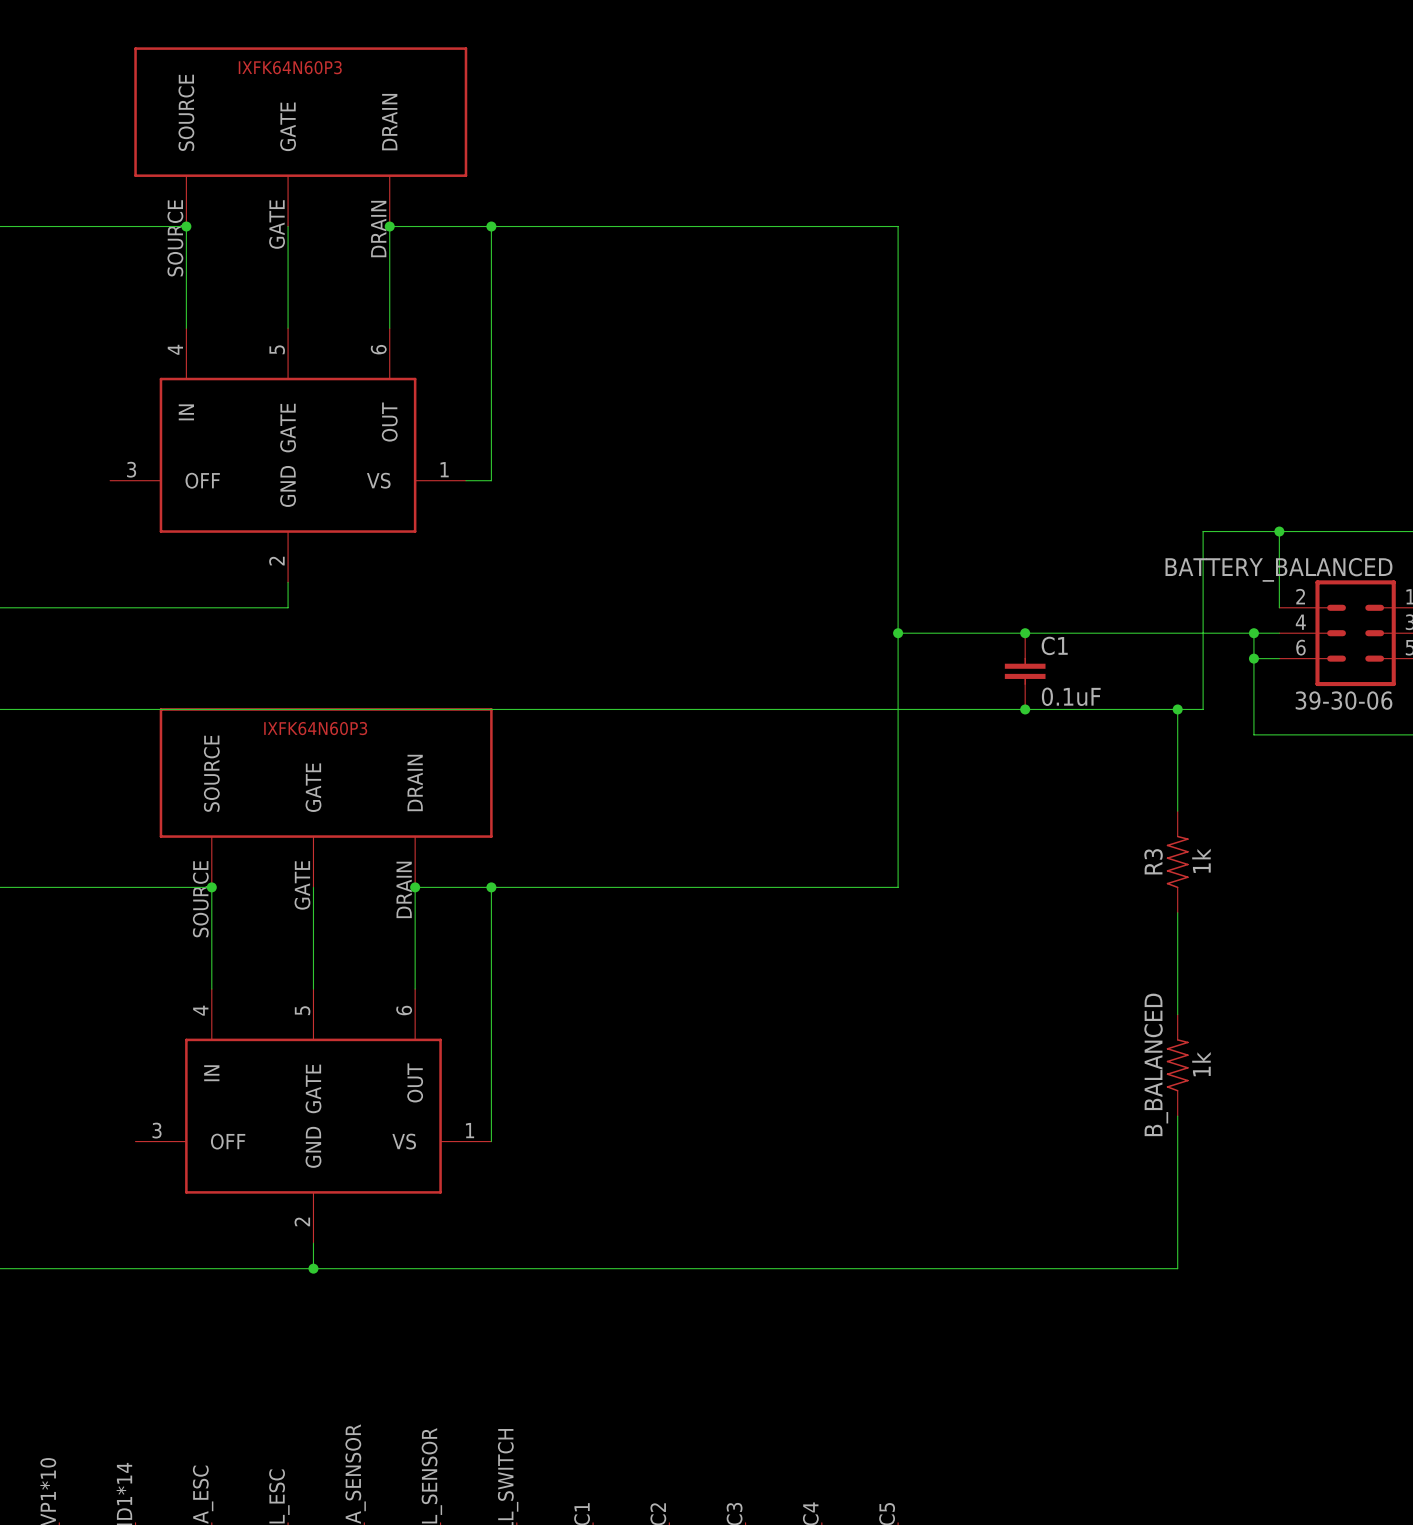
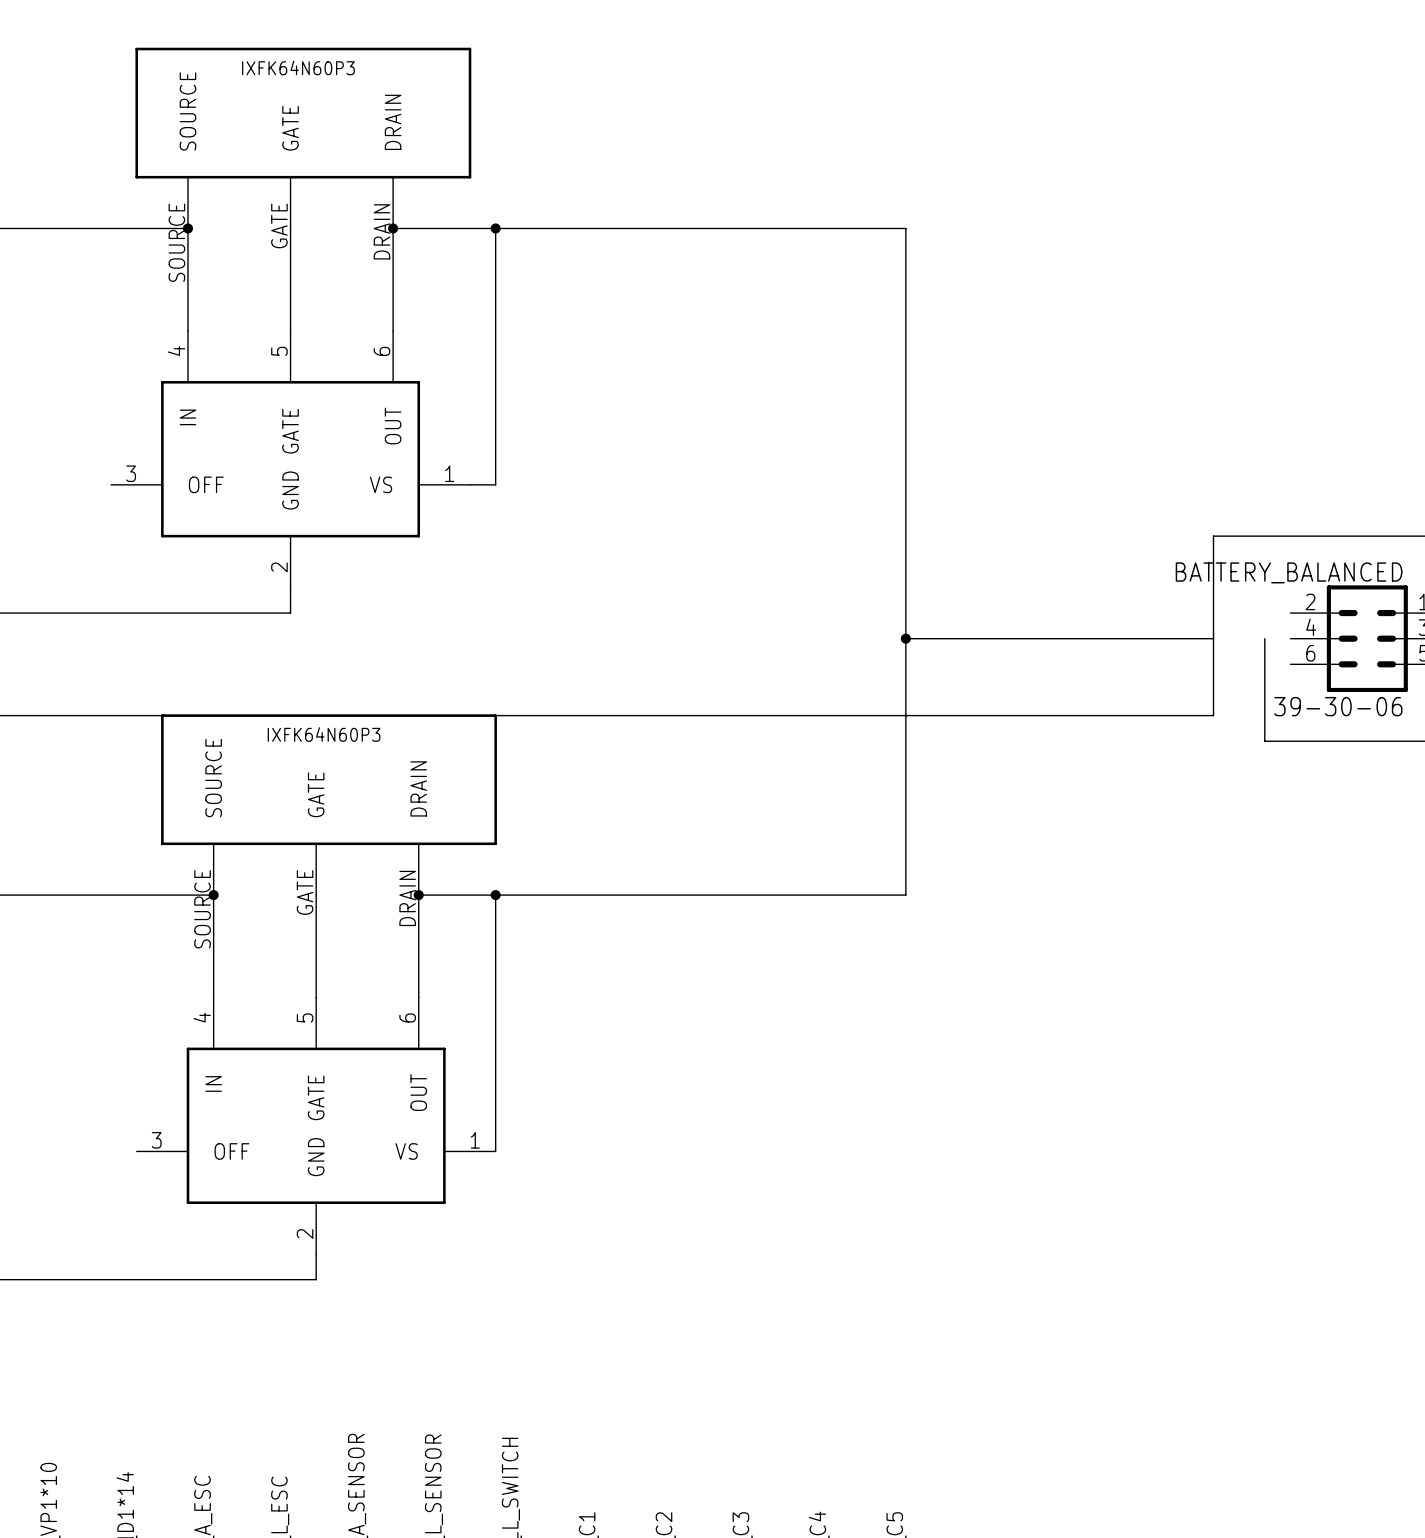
wire: (1279, 531) (1279, 607) -> none
junction: (1279, 531) -> none
junction: (1025, 633) -> none
wire: (1203, 633) (1279, 633) -> none
junction: (1253, 633) -> none
wire: (1253, 658) (1279, 658) -> none
junction: (1253, 658) -> none
C1: 0.1uF (1025, 671) -> none
junction: (1025, 709) -> none
wire: (1177, 709) (1177, 811) -> none
junction: (1177, 709) -> none
R3: 1k (1177, 861) -> none
wire: (1177, 912) (1177, 1014) -> none
B_BALANCED: 1k (1177, 1065) -> none
wire: (1177, 1116) (1177, 1268) (313, 1268) -> none
junction: (313, 1268) -> none

